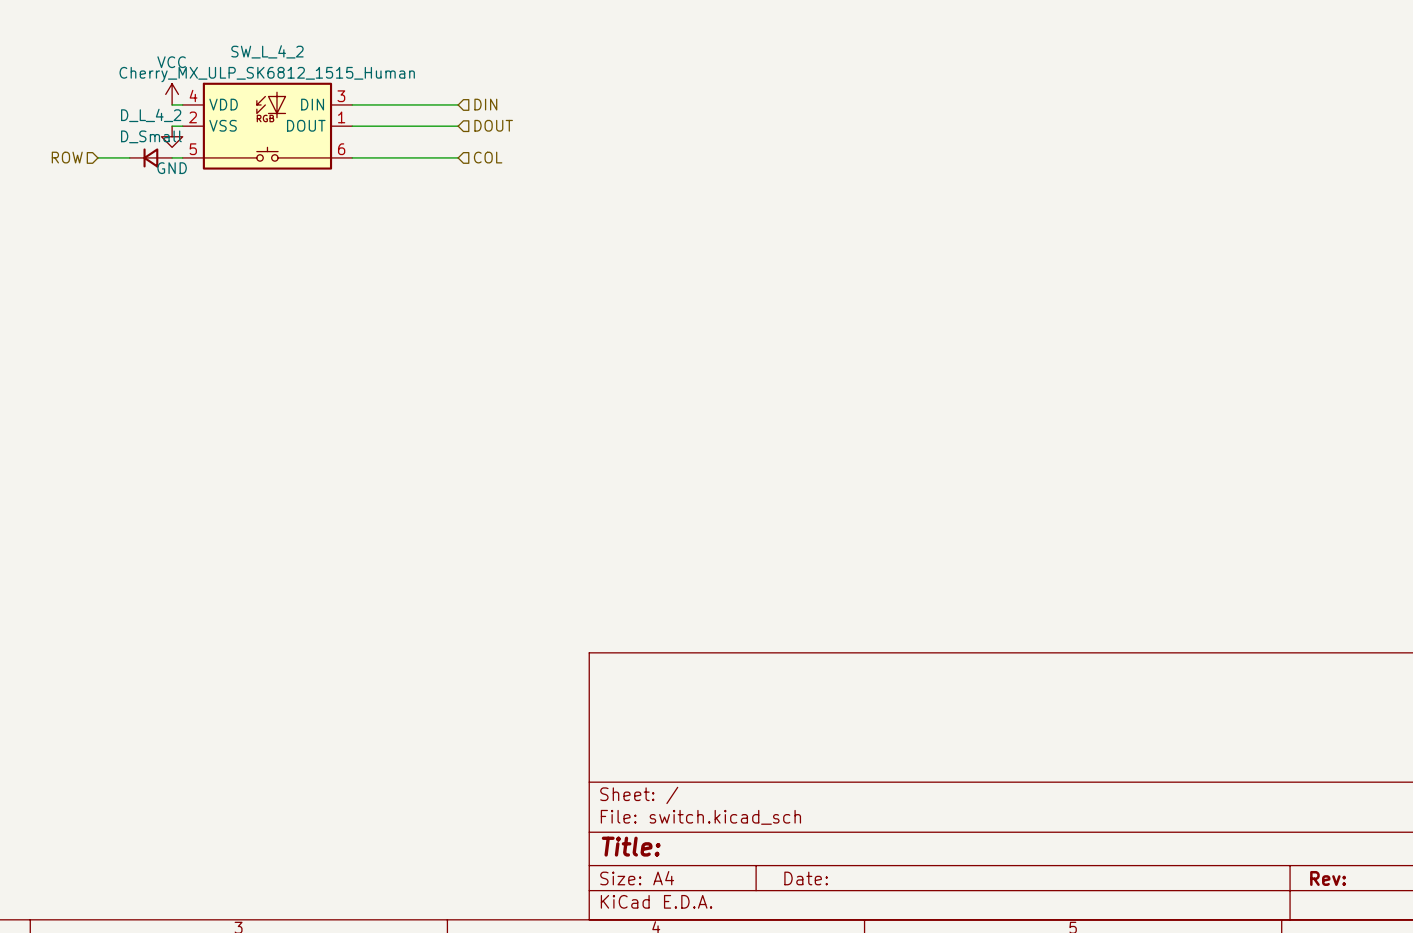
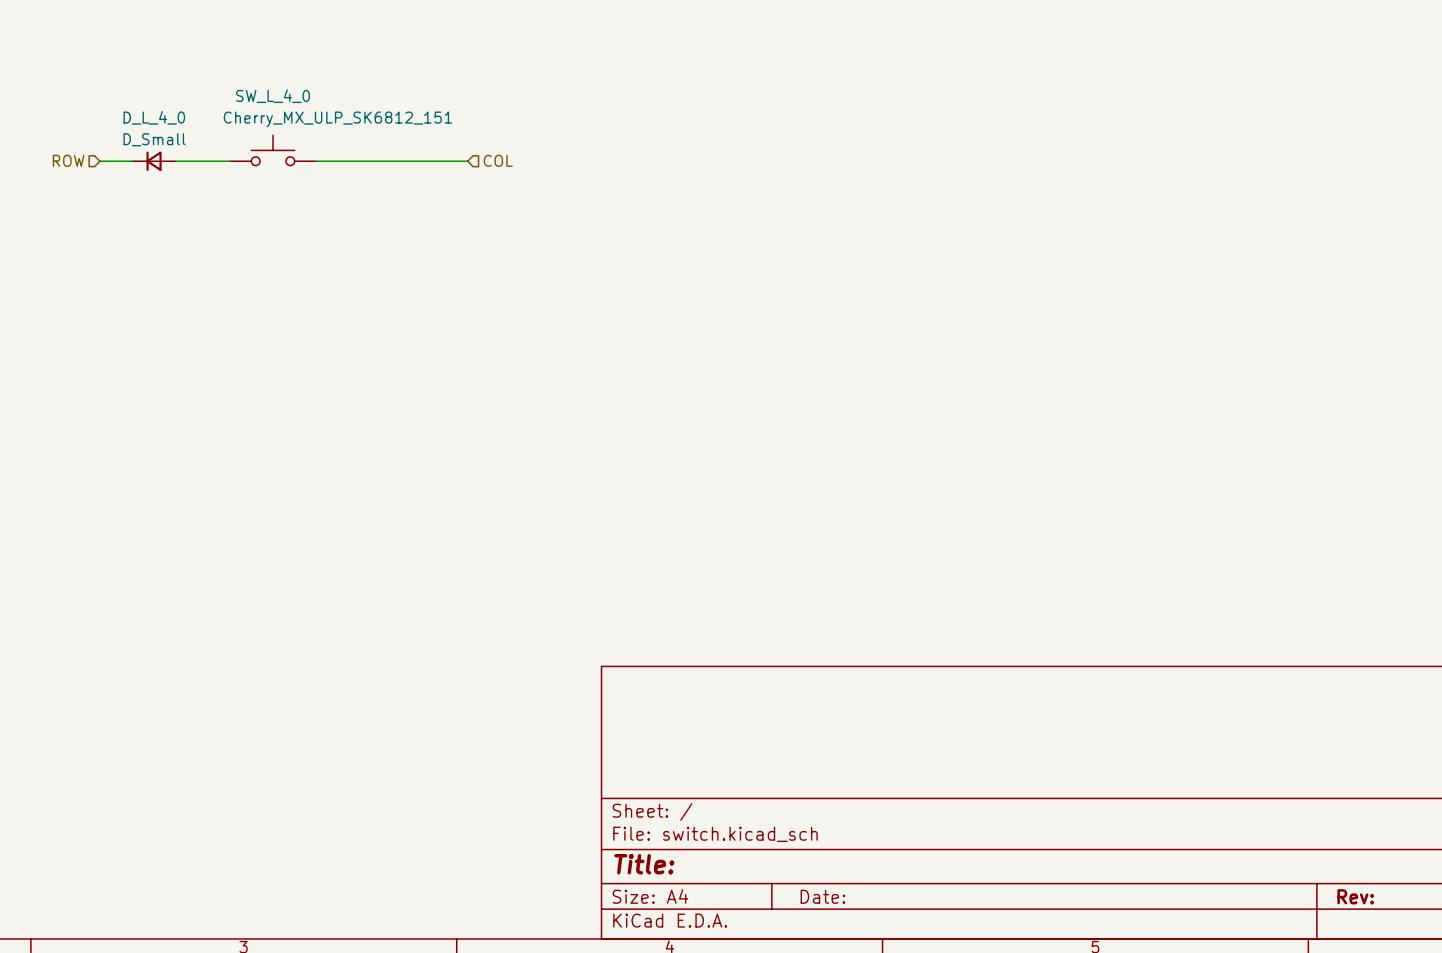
power symbol: VCC (172, 94) -> none
wire: (172, 104) (182, 104) -> none
wire: (352, 104) (458, 104) -> none
hierarchical label: DIN (485, 104) -> none
D_L_4_2 name: D_L_4_2 (151, 115) -> D_L_4_0 (154, 117)
hierarchical label: DOUT (493, 125) -> none
wire: (172, 126) (182, 126) -> none
SW_L_4_2: Cherry_MX_ULP_SK6812_1515_Human (267, 126) -> none
wire: (352, 126) (458, 126) -> none
power symbol: GND (172, 136) -> none
SW_L_4_0: none -> Cherry_MX_ULP_SK6812_151 (273, 150)

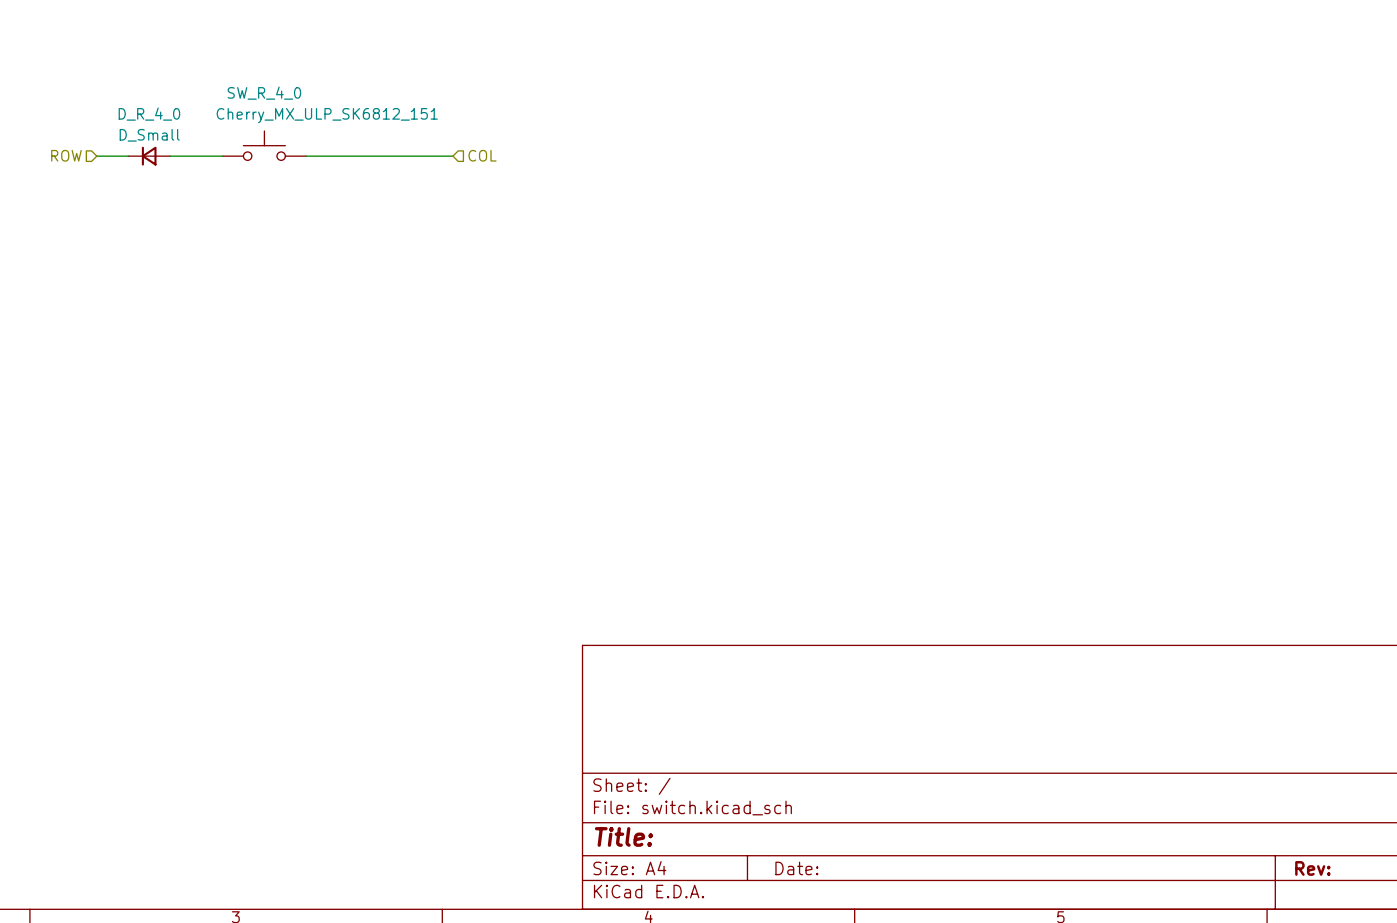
SW_L_4_0 name: SW_L_4_0 (273, 96) -> SW_R_4_0 (264, 93)
D_L_4_0 name: D_L_4_0 (154, 117) -> D_R_4_0 (149, 114)

